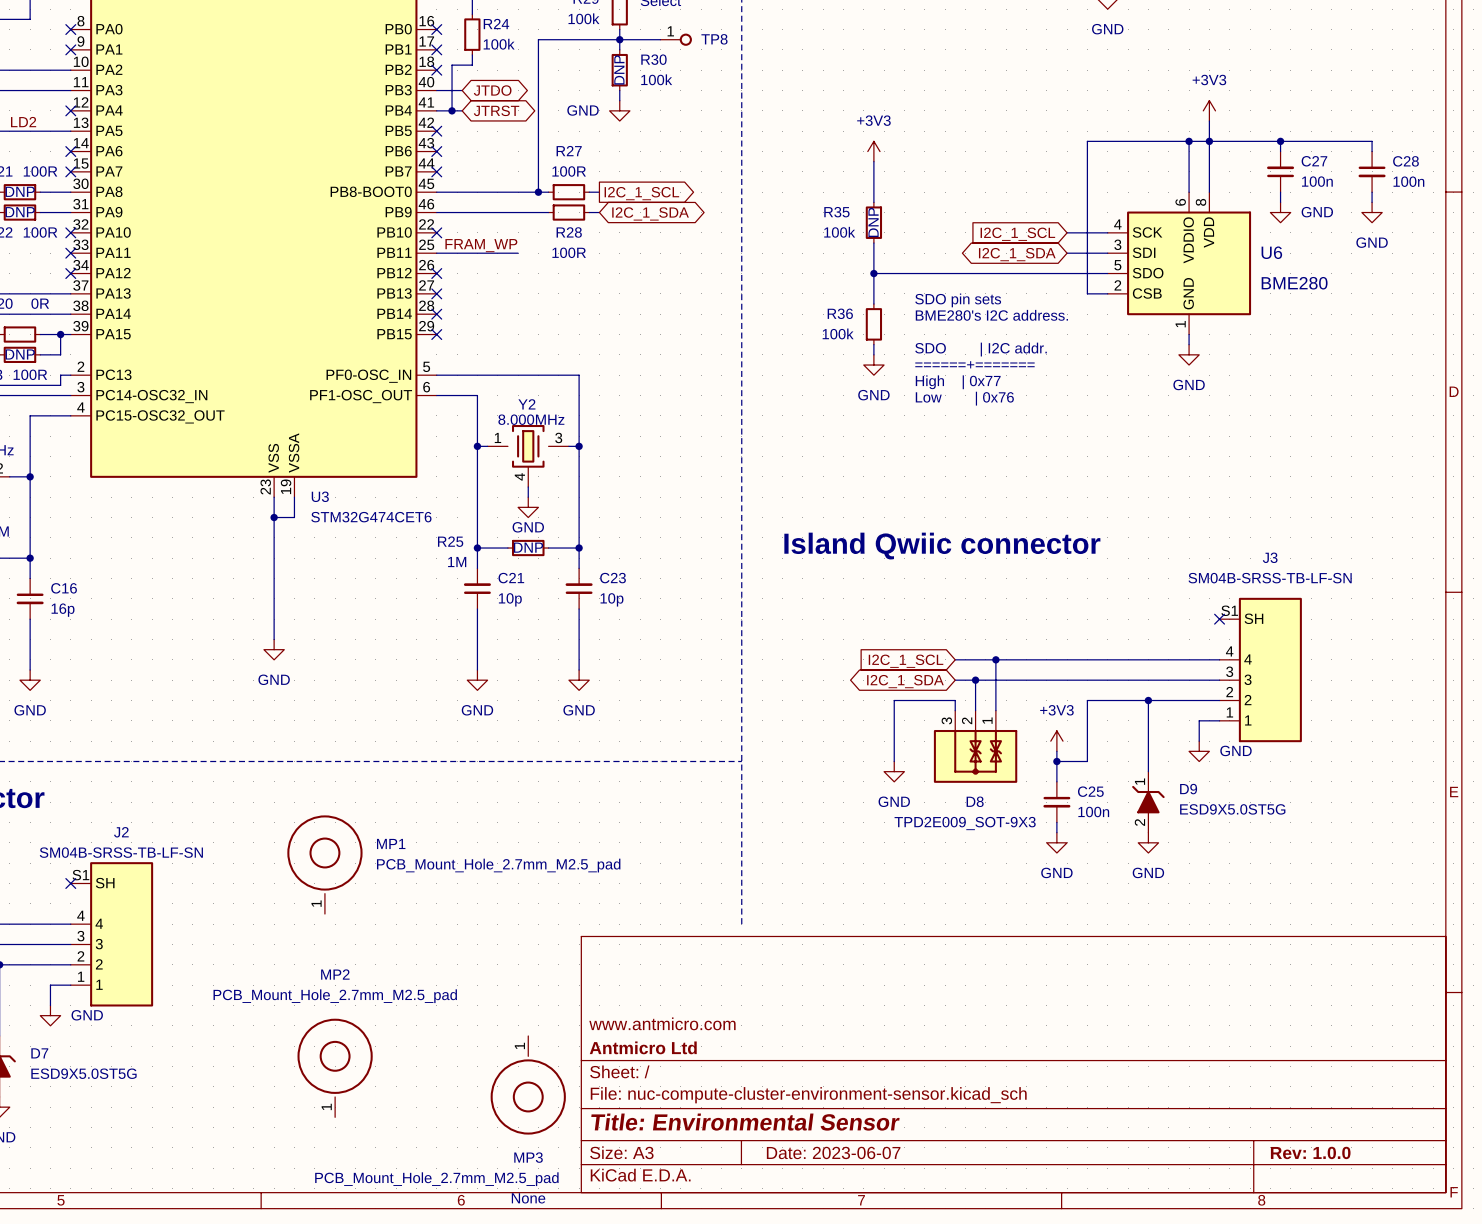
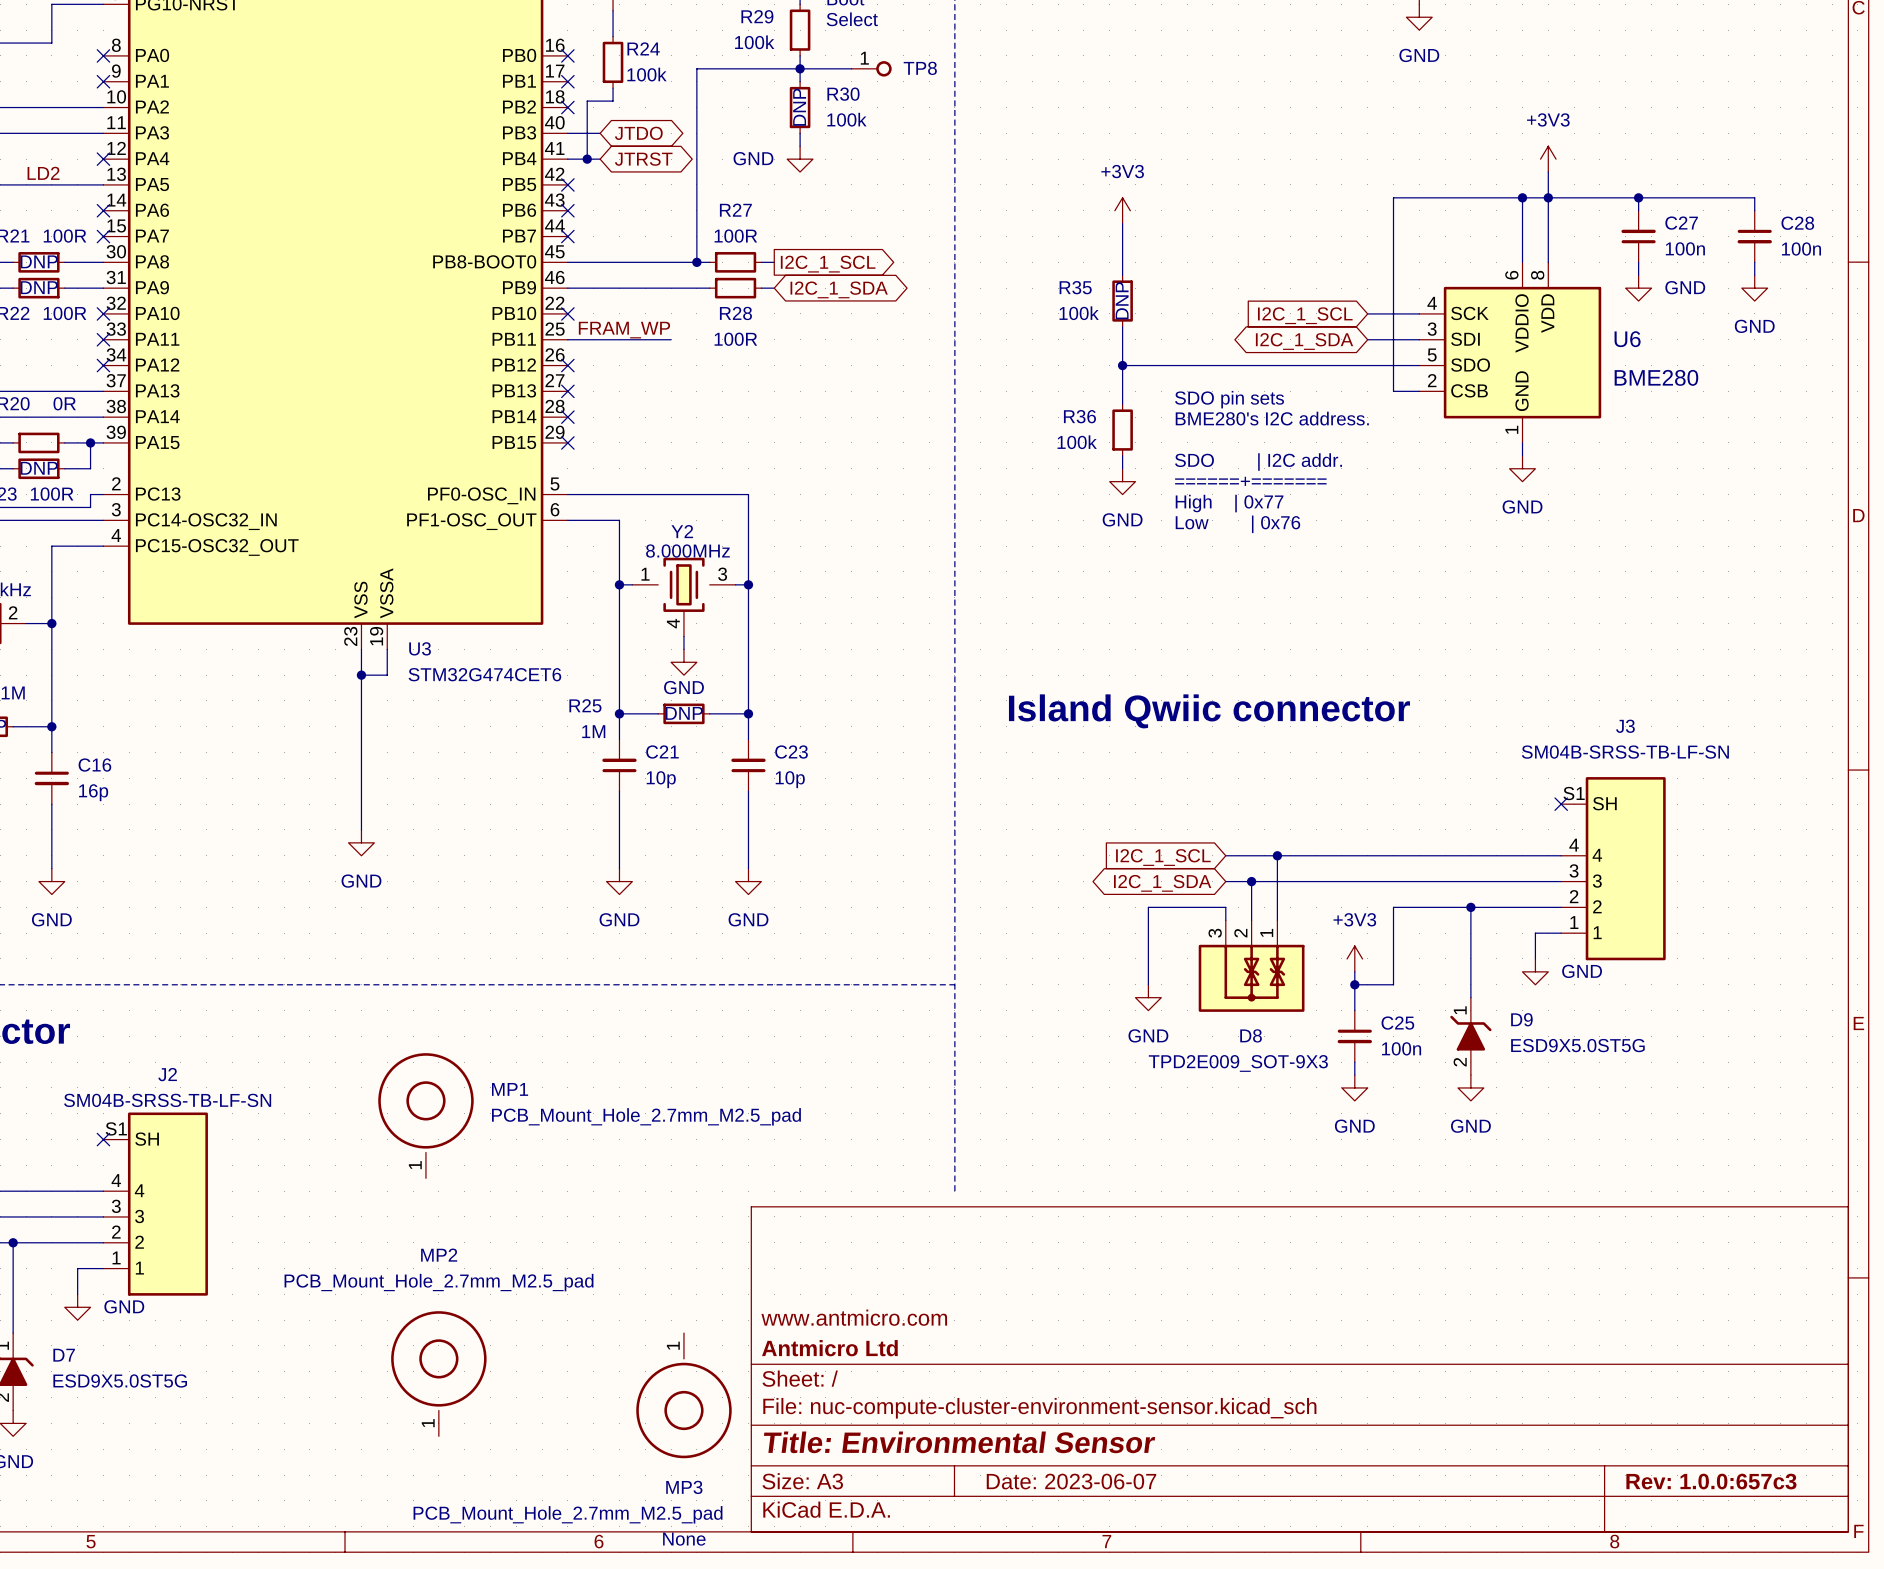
title block: Rev: 1.0.0 (1310, 1152) -> Rev: 1.0.0:657c3 (1711, 1481)

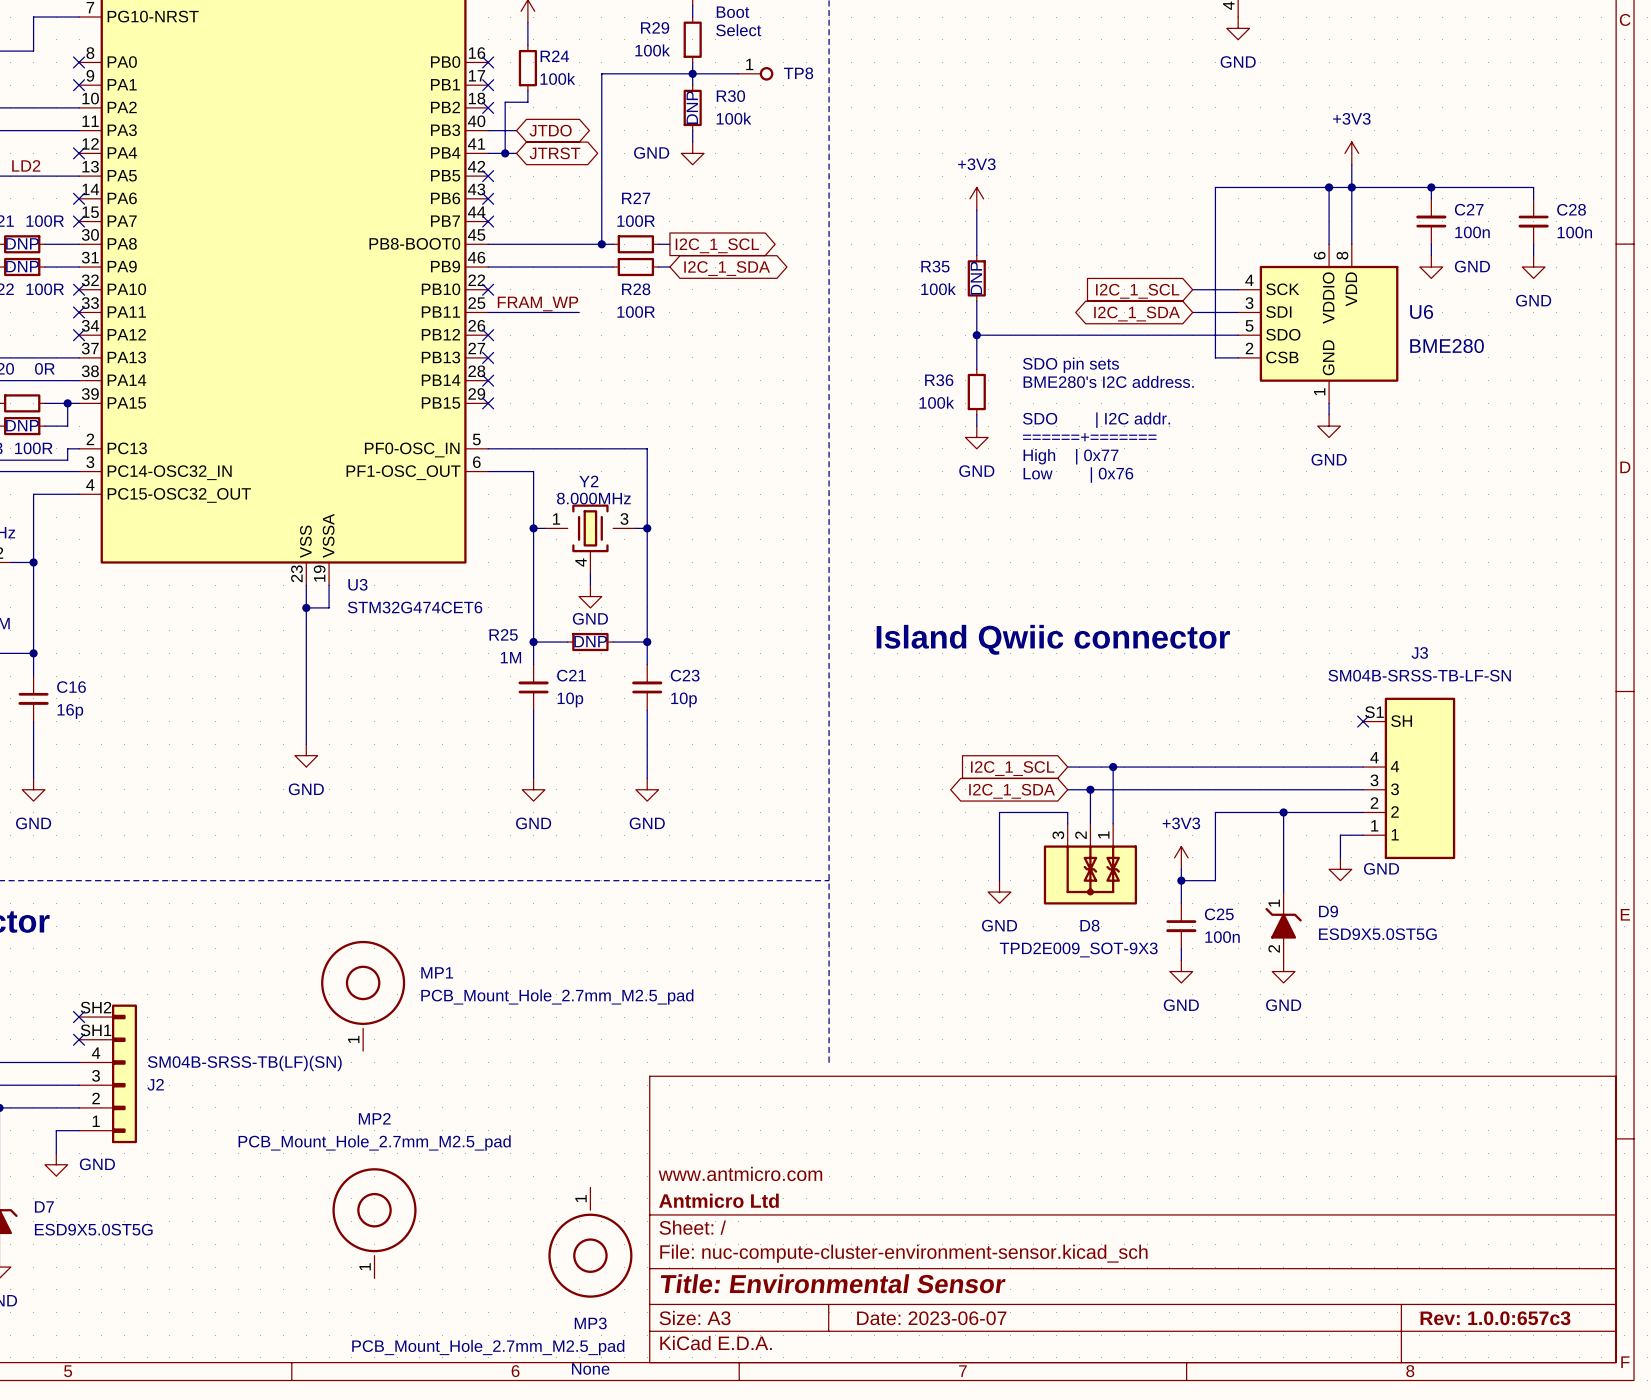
J2 name position: J2 (167, 1074) -> J2 (155, 1084)
J2 value: SM04B-SRSS-TB-LF-SN (167, 1100) -> none
J2 symbol: [103, 1112, 208, 1296] -> [79, 1004, 137, 1144]
no-connect mark: none -> (79, 1039)
J2 text: none -> SM04B-SRSS-TB(LF)(SN) (244, 1063)

